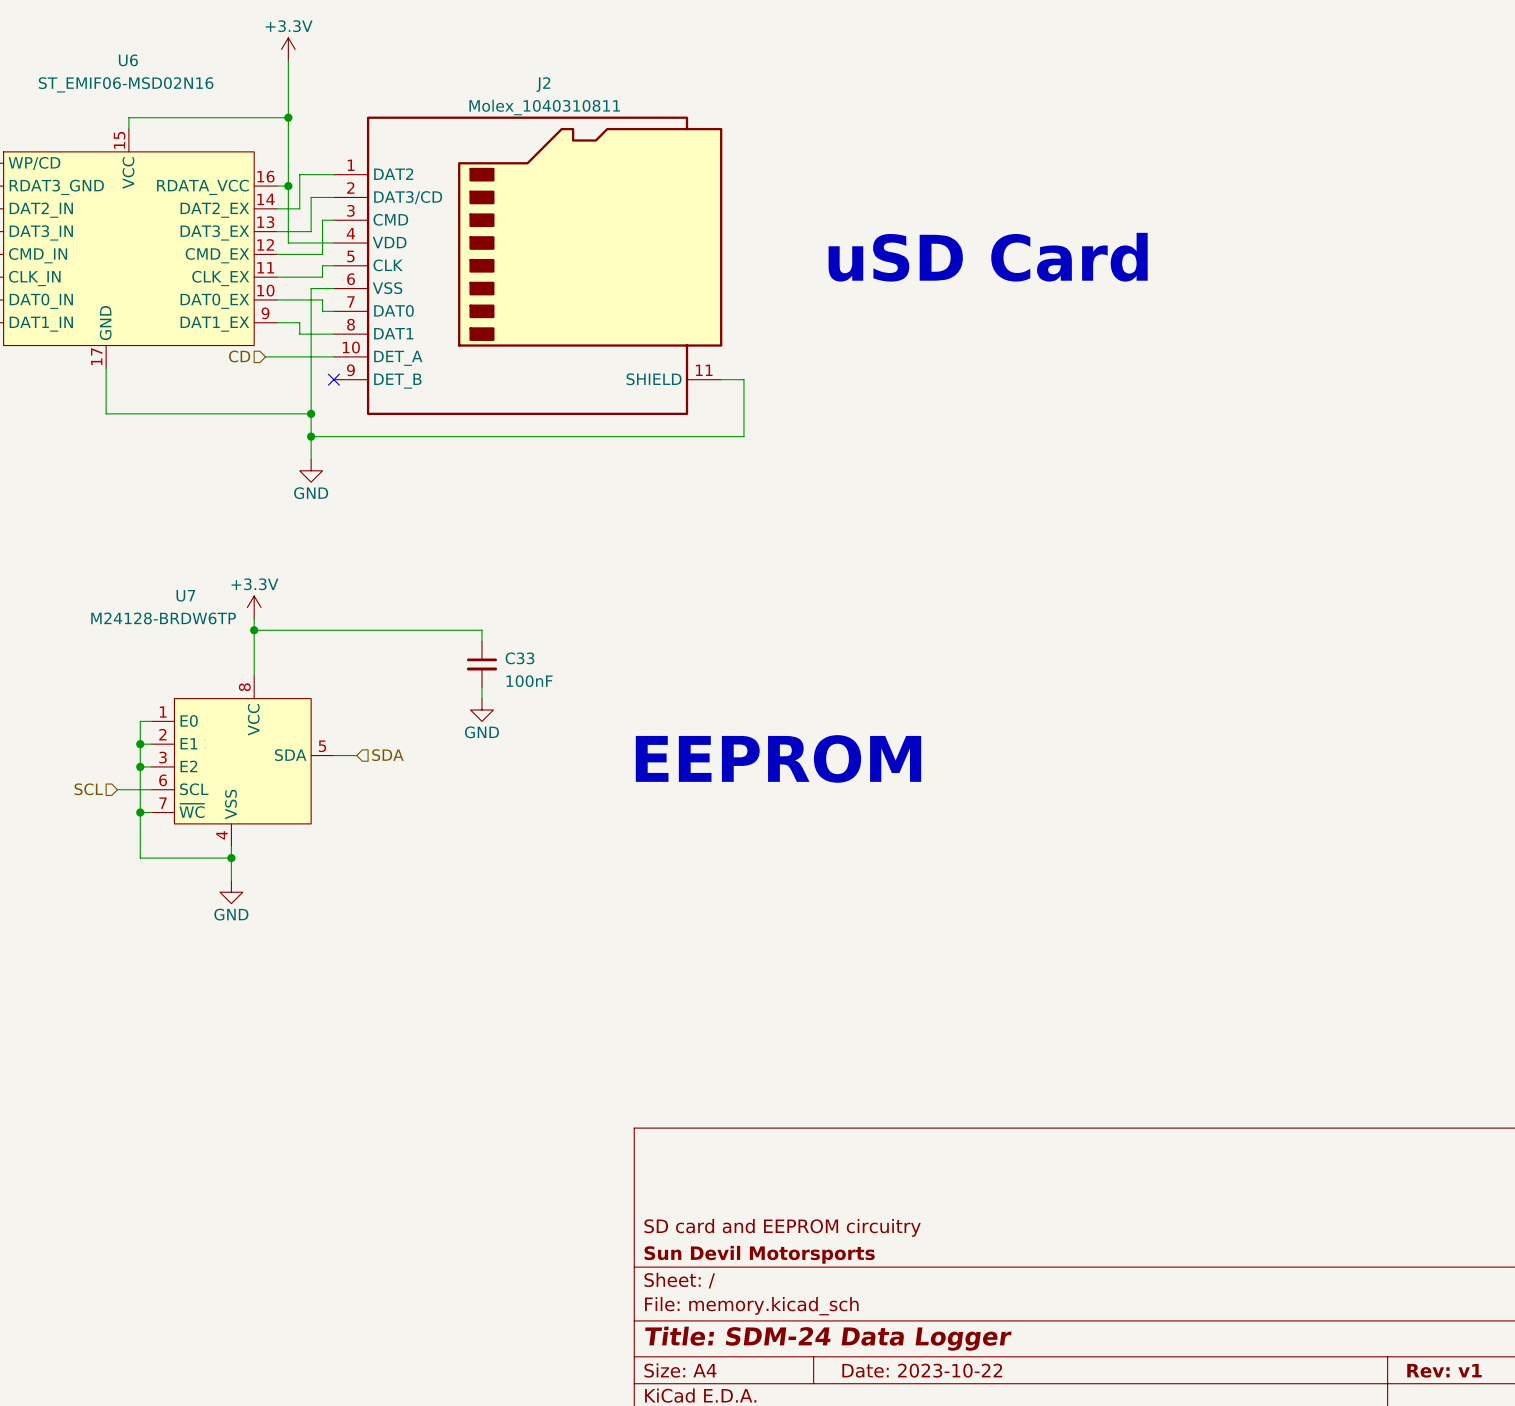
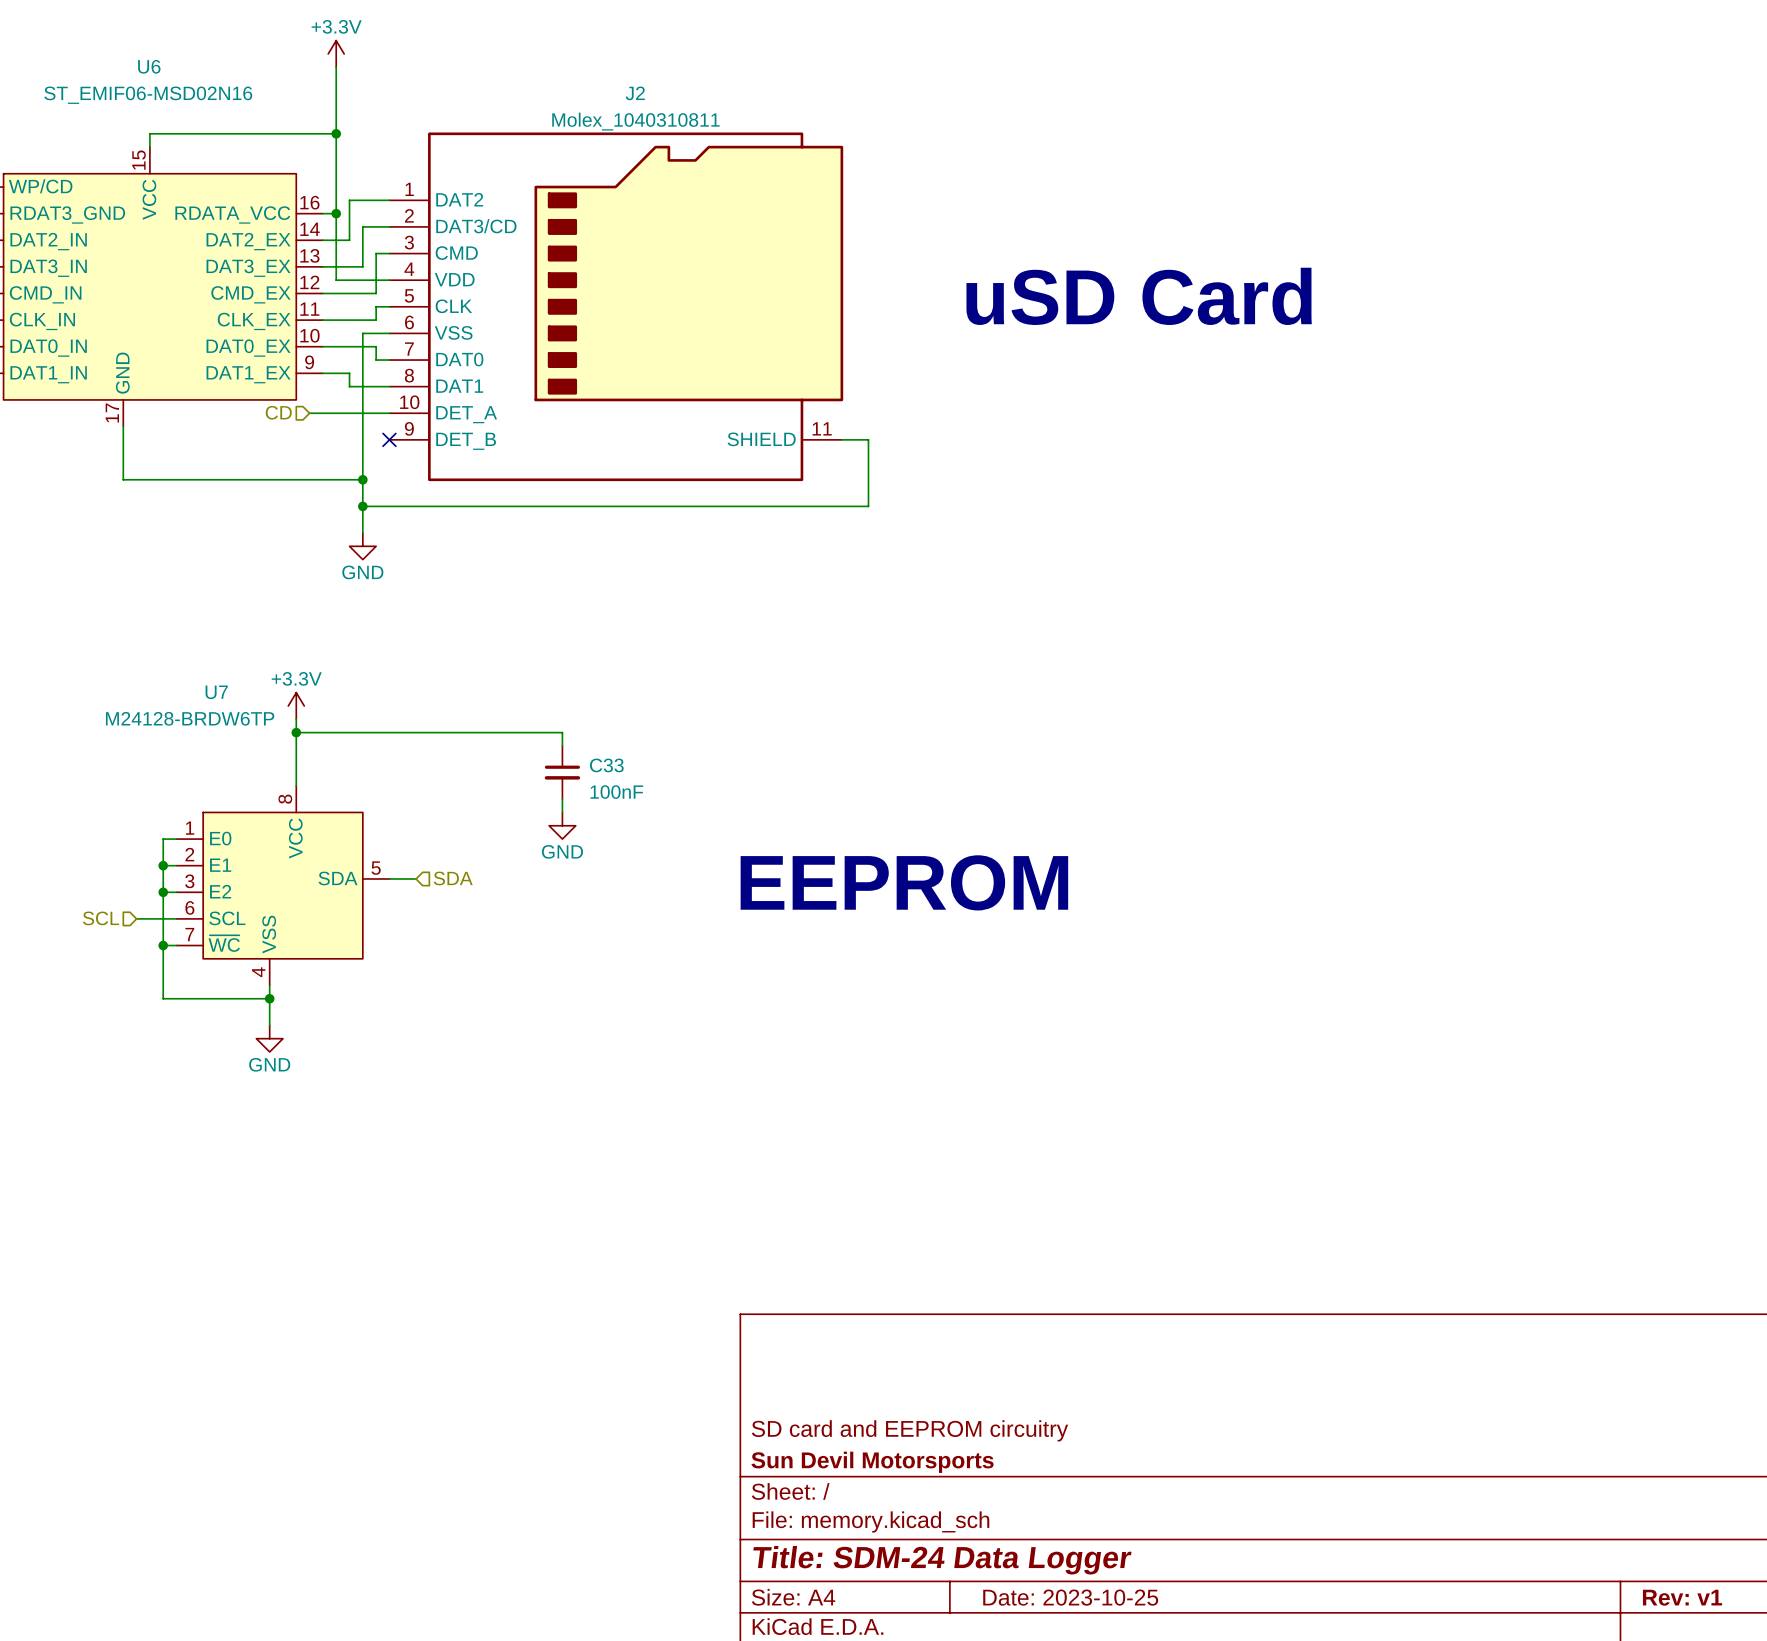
title block: Date: 2023-10-22 (922, 1370) -> Date: 2023-10-25 (1070, 1597)

